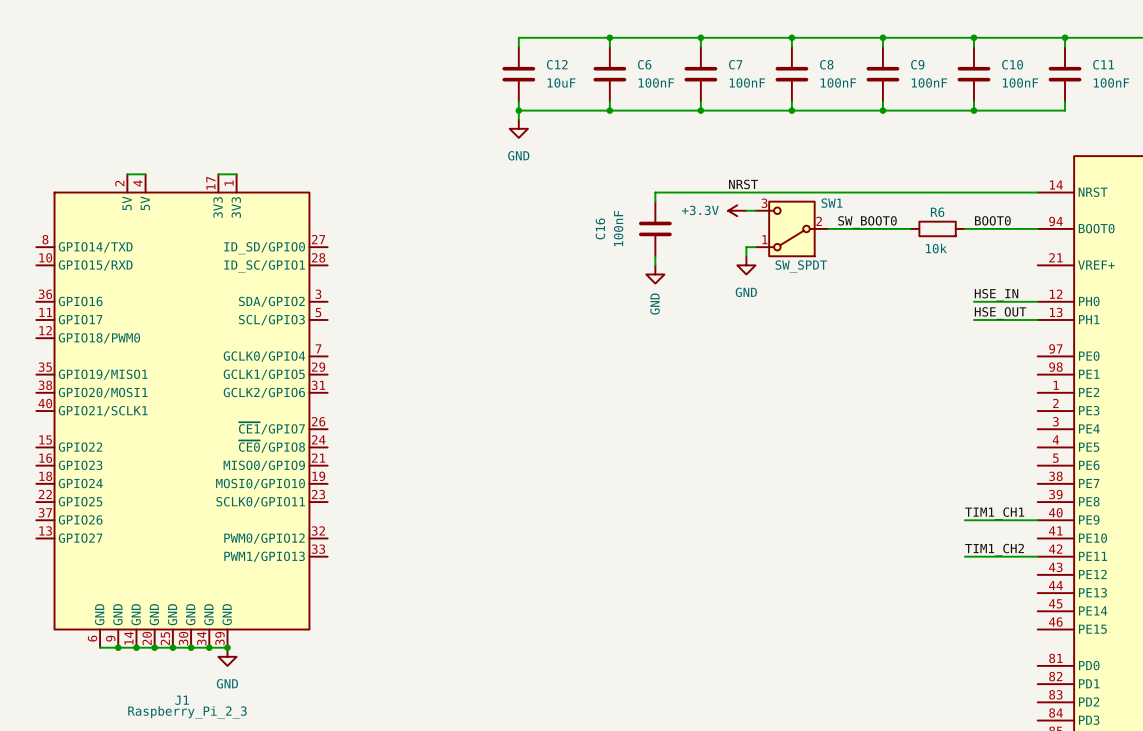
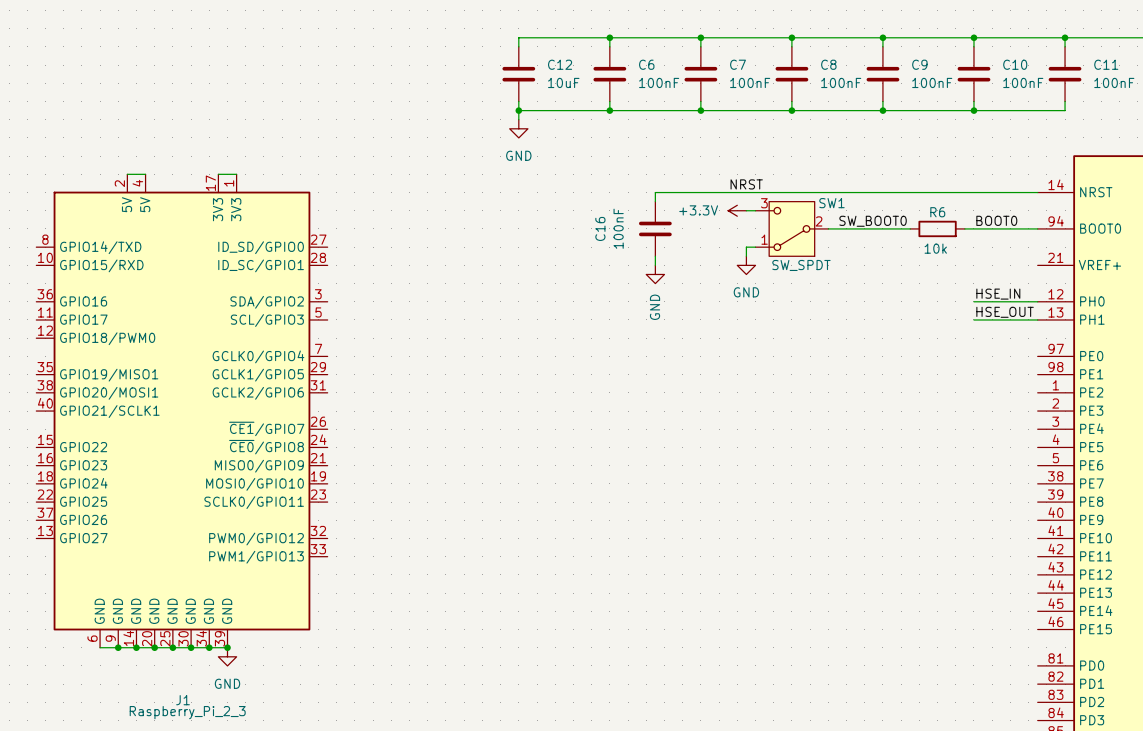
label: TIM1_CH1 (994, 513) -> none
wire: (964, 520) (1037, 520) -> none
label: TIM1_CH2 (994, 549) -> none
wire: (964, 556) (1037, 556) -> none

